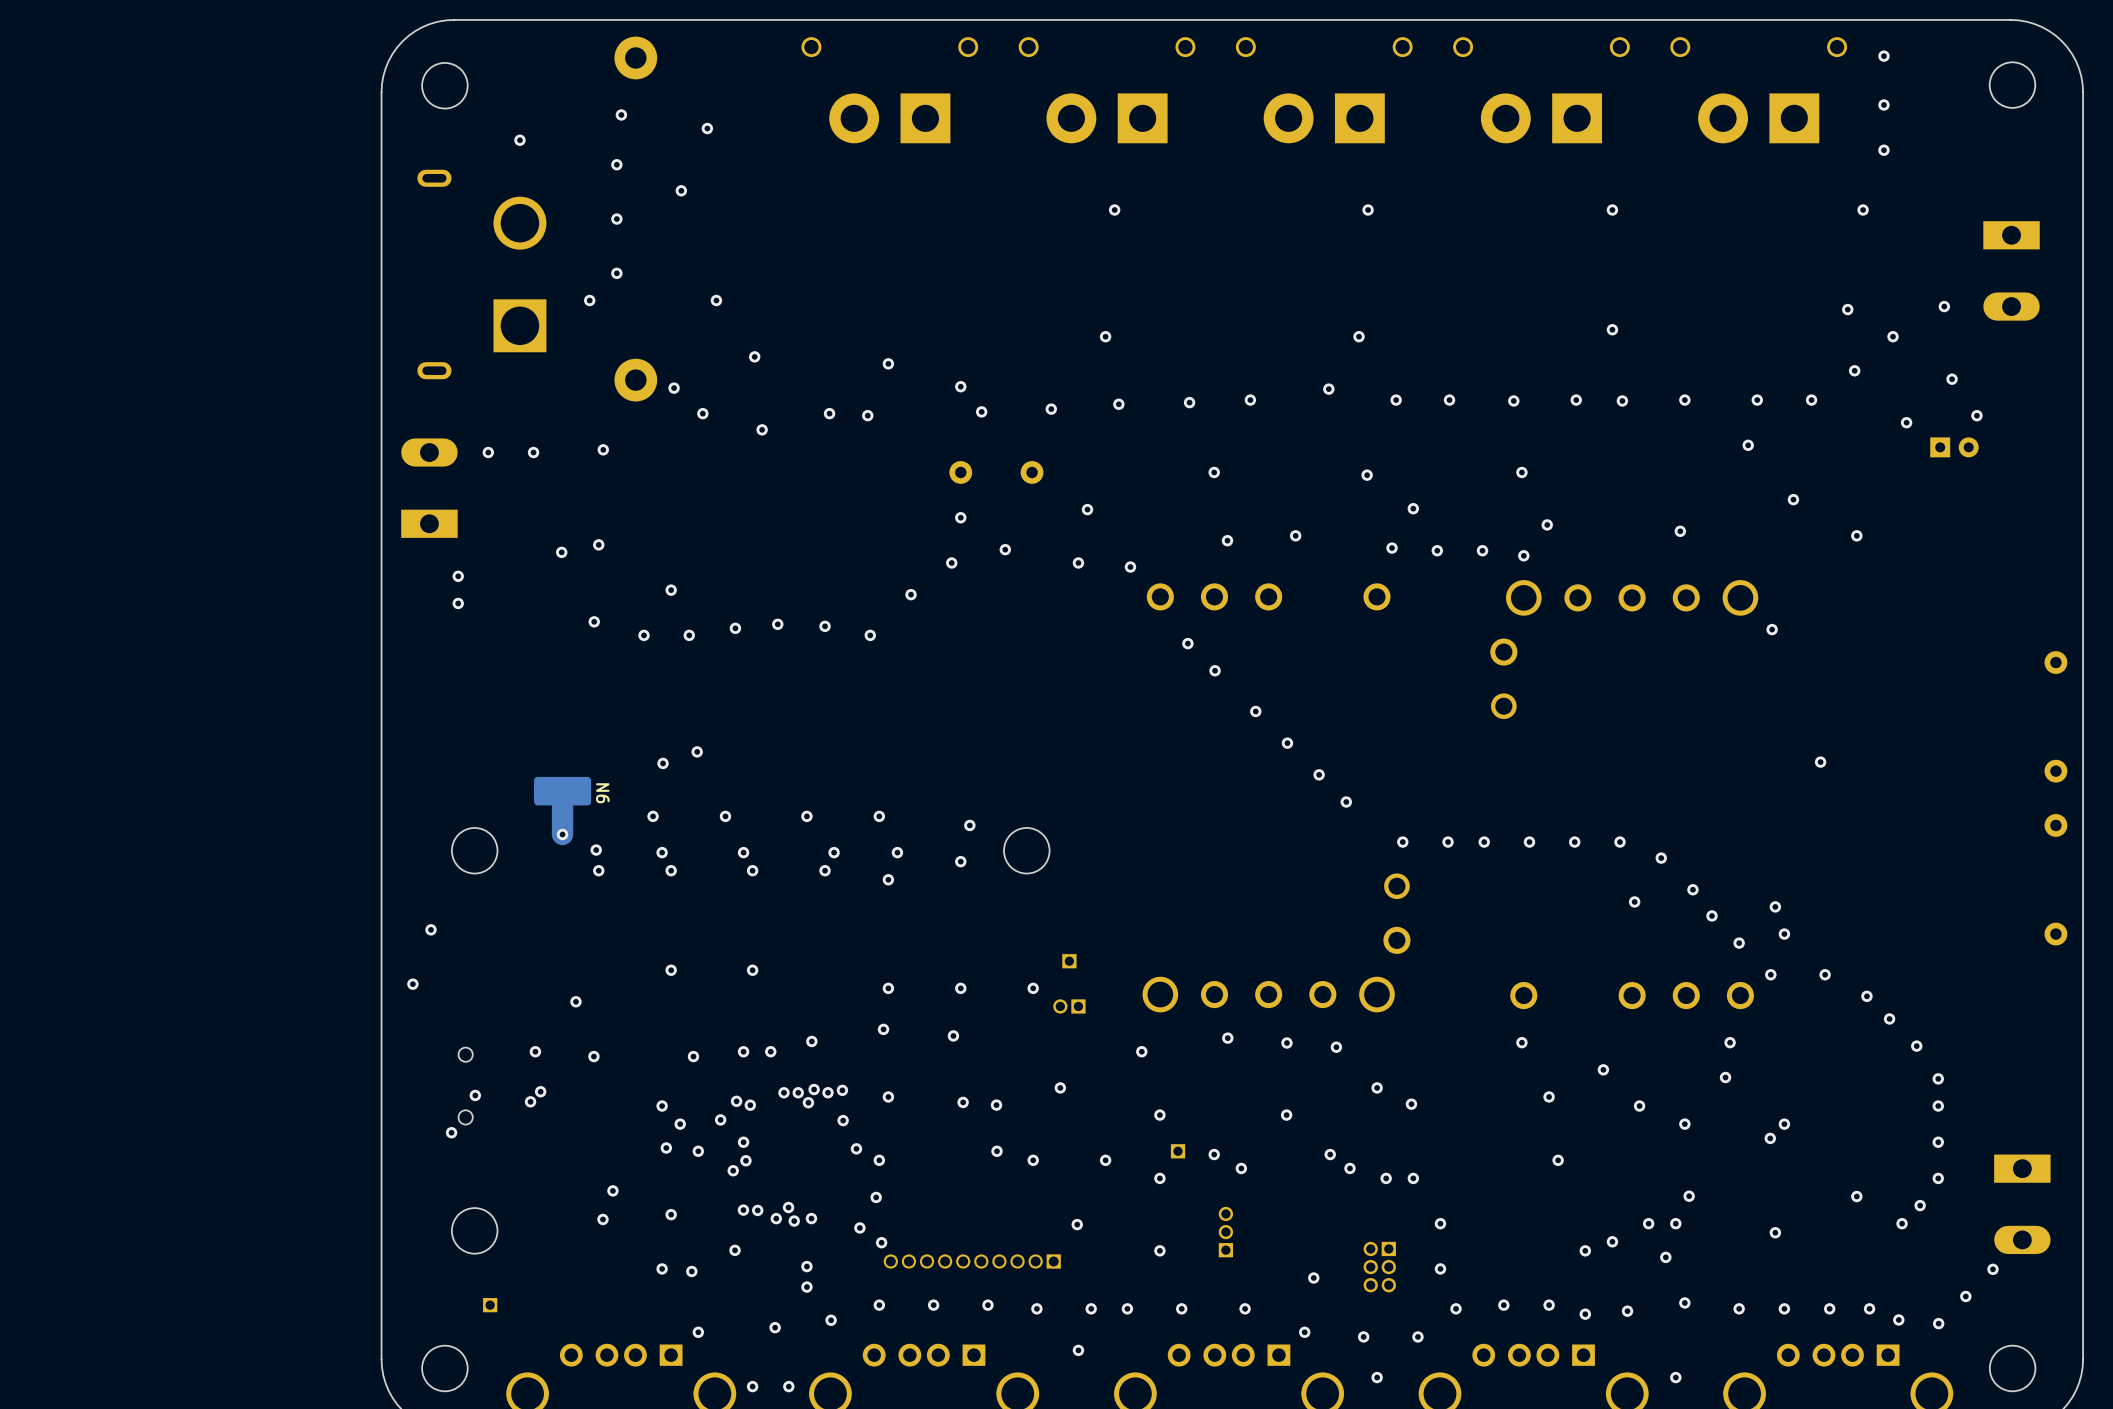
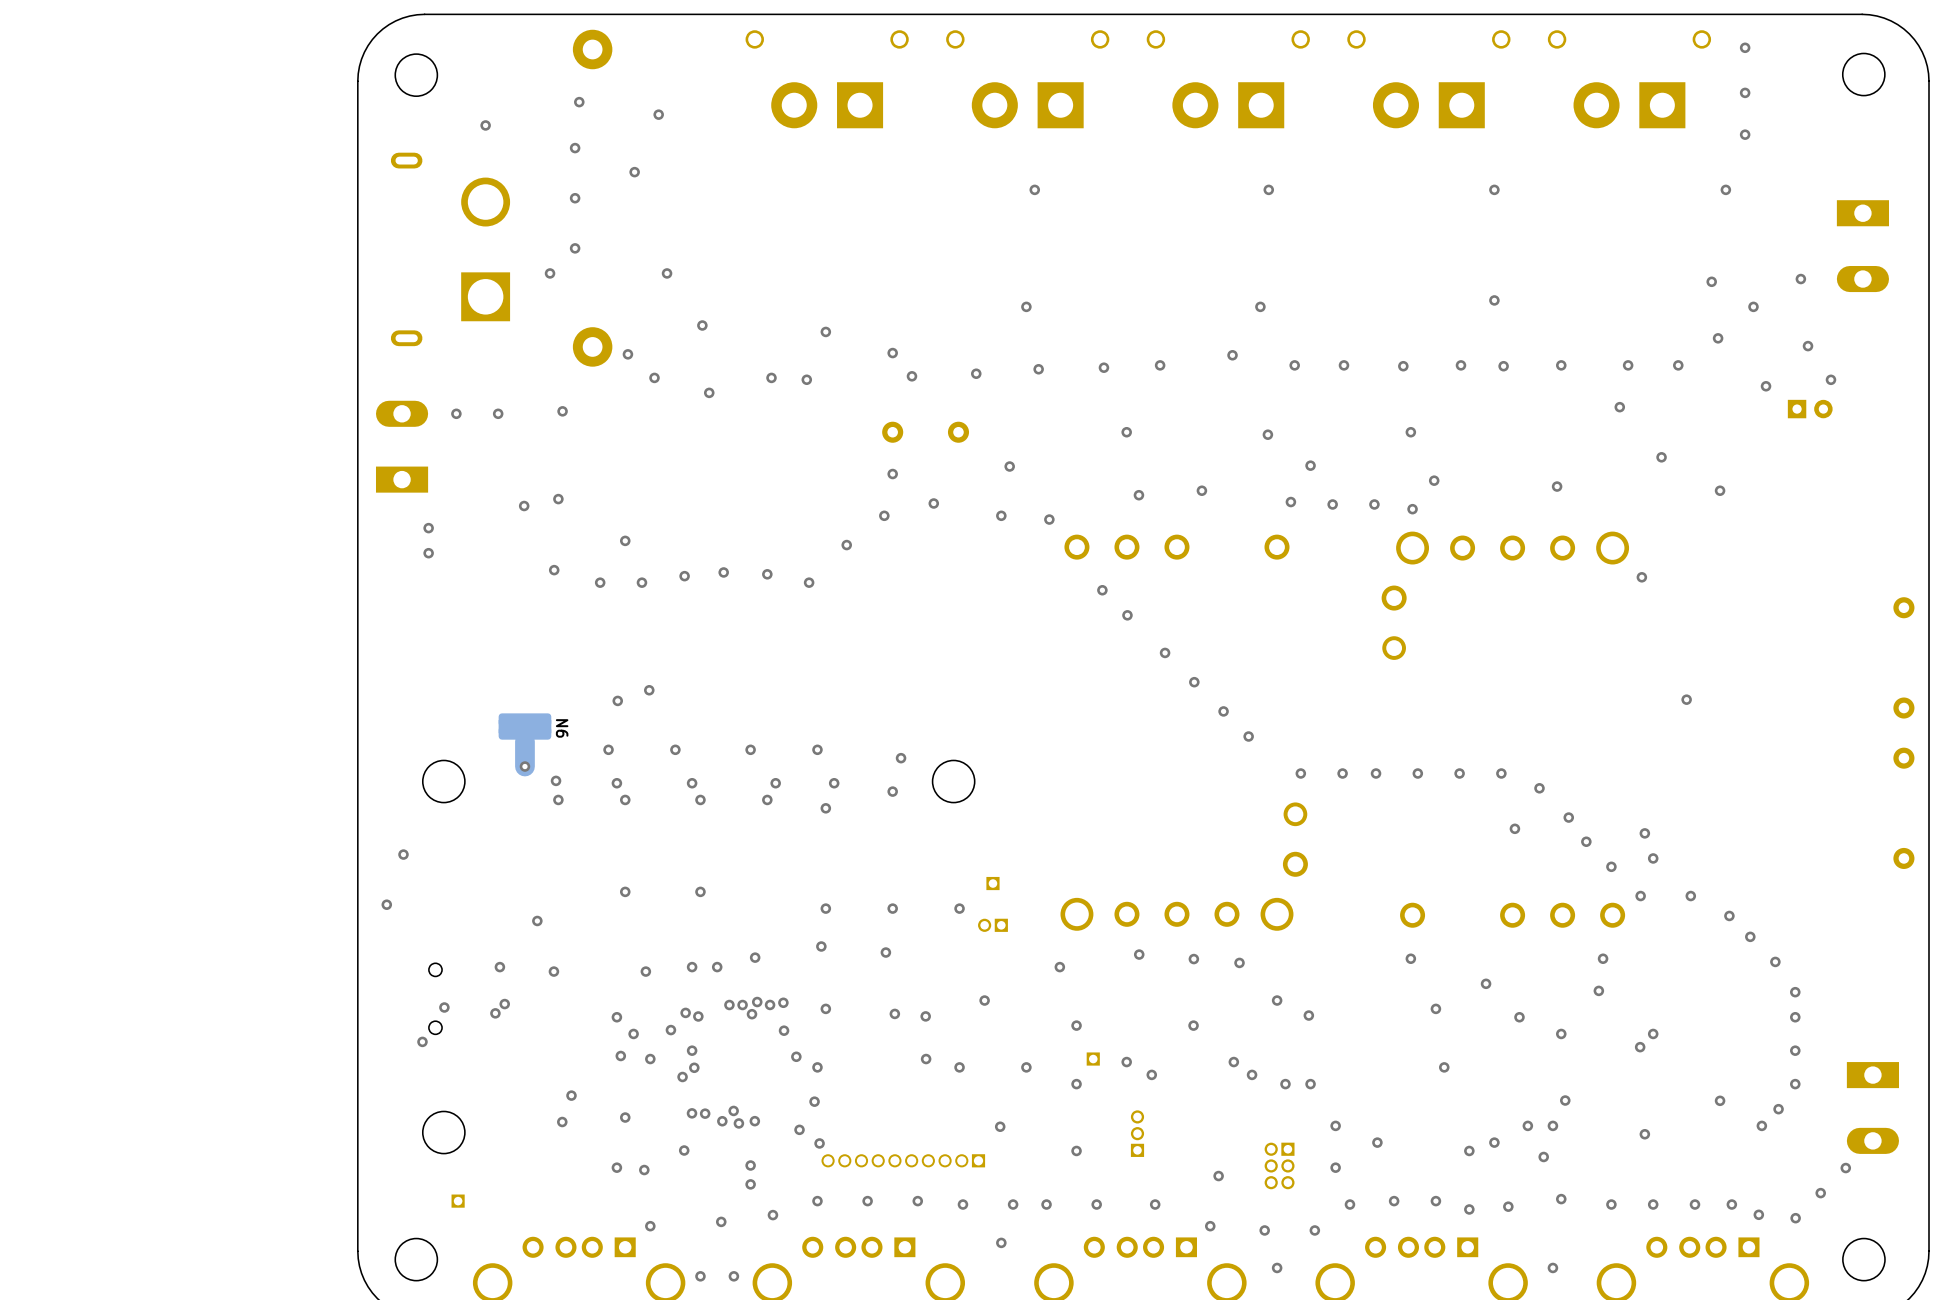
via: none -> (1377, 1142)

